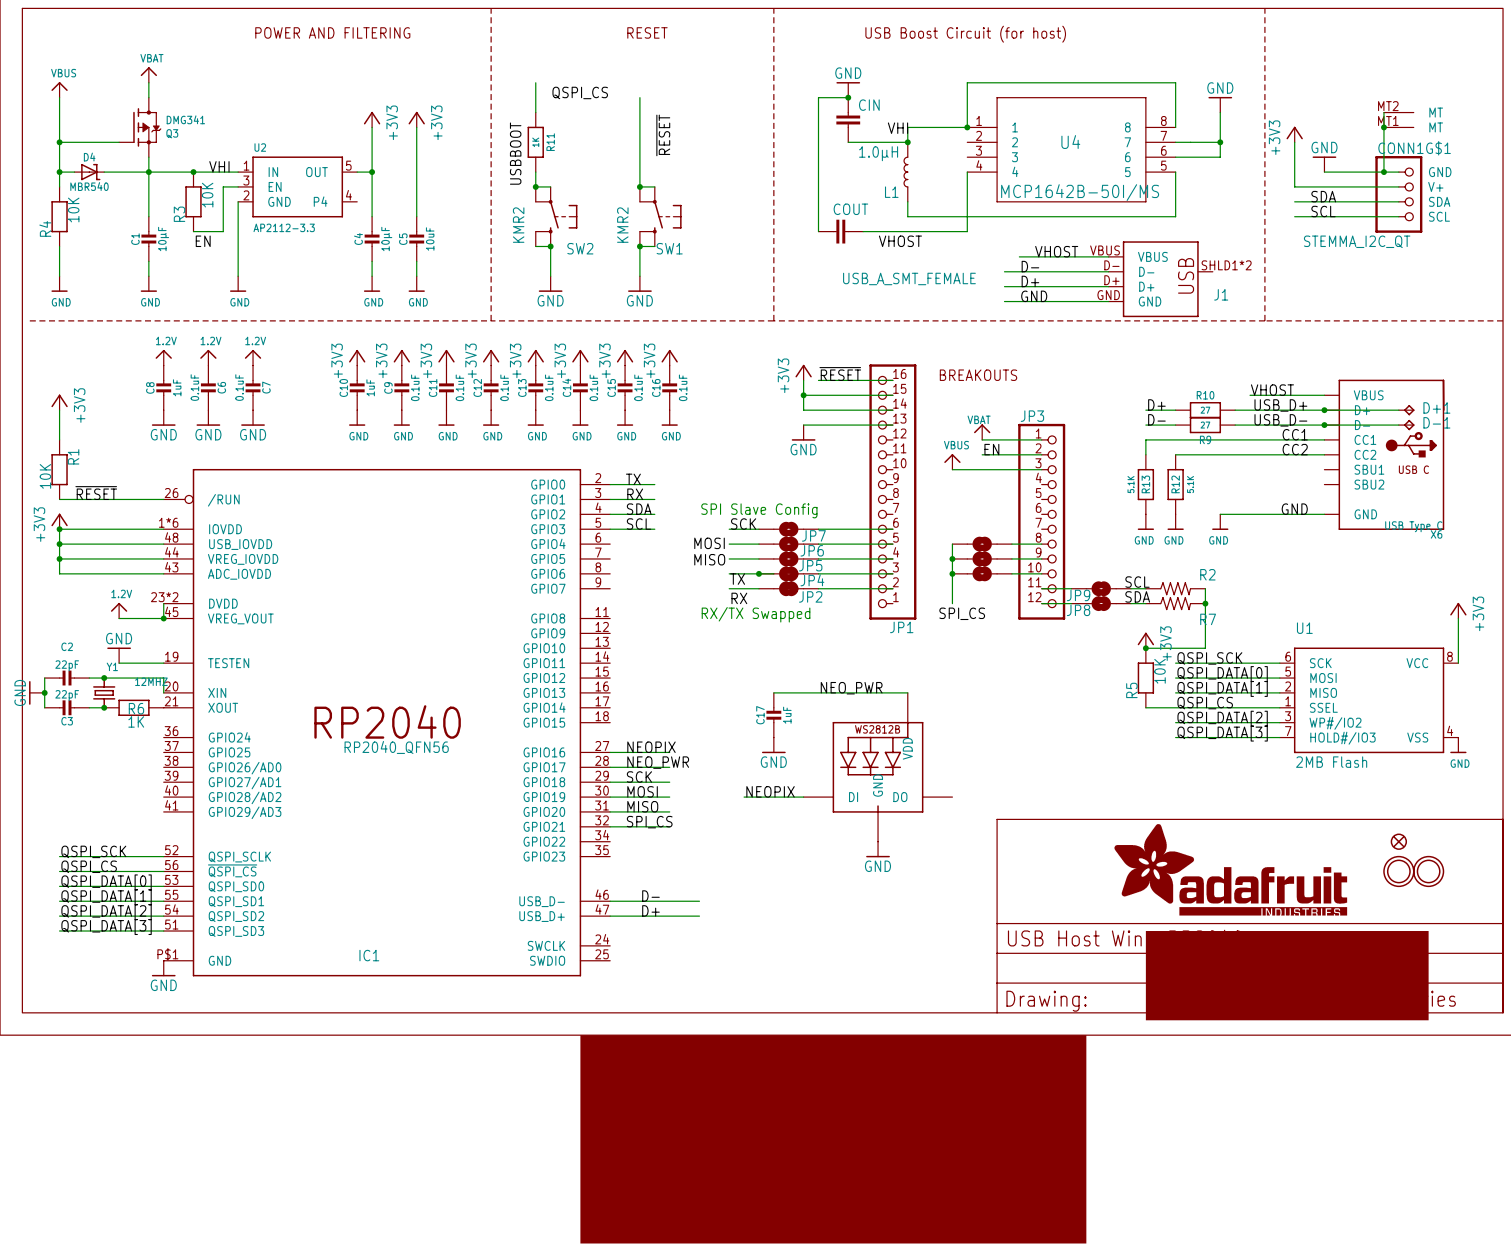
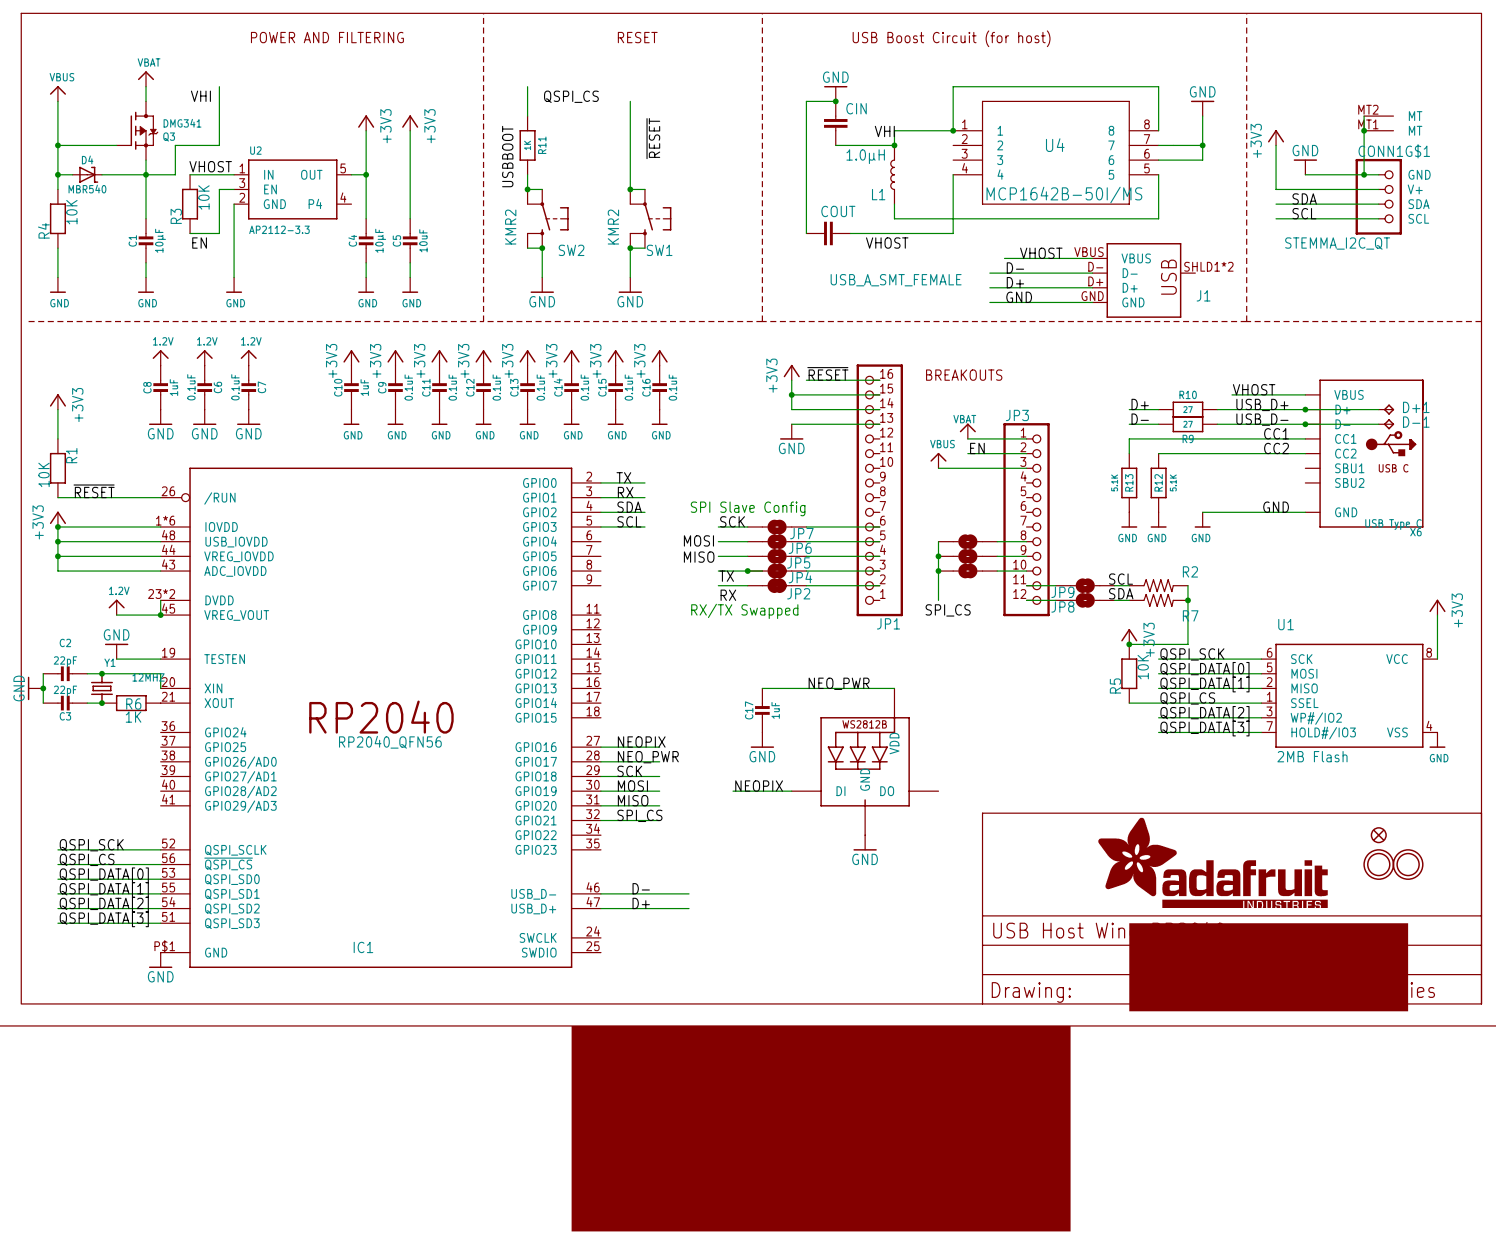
label: none -> VHOST (210, 166)
label position: VHI (219, 166) -> VHI (200, 96)
wire: (178, 172) (193, 172) -> (175, 174) (175, 145) (219, 145) (219, 86)
junction: (193, 172) -> none

